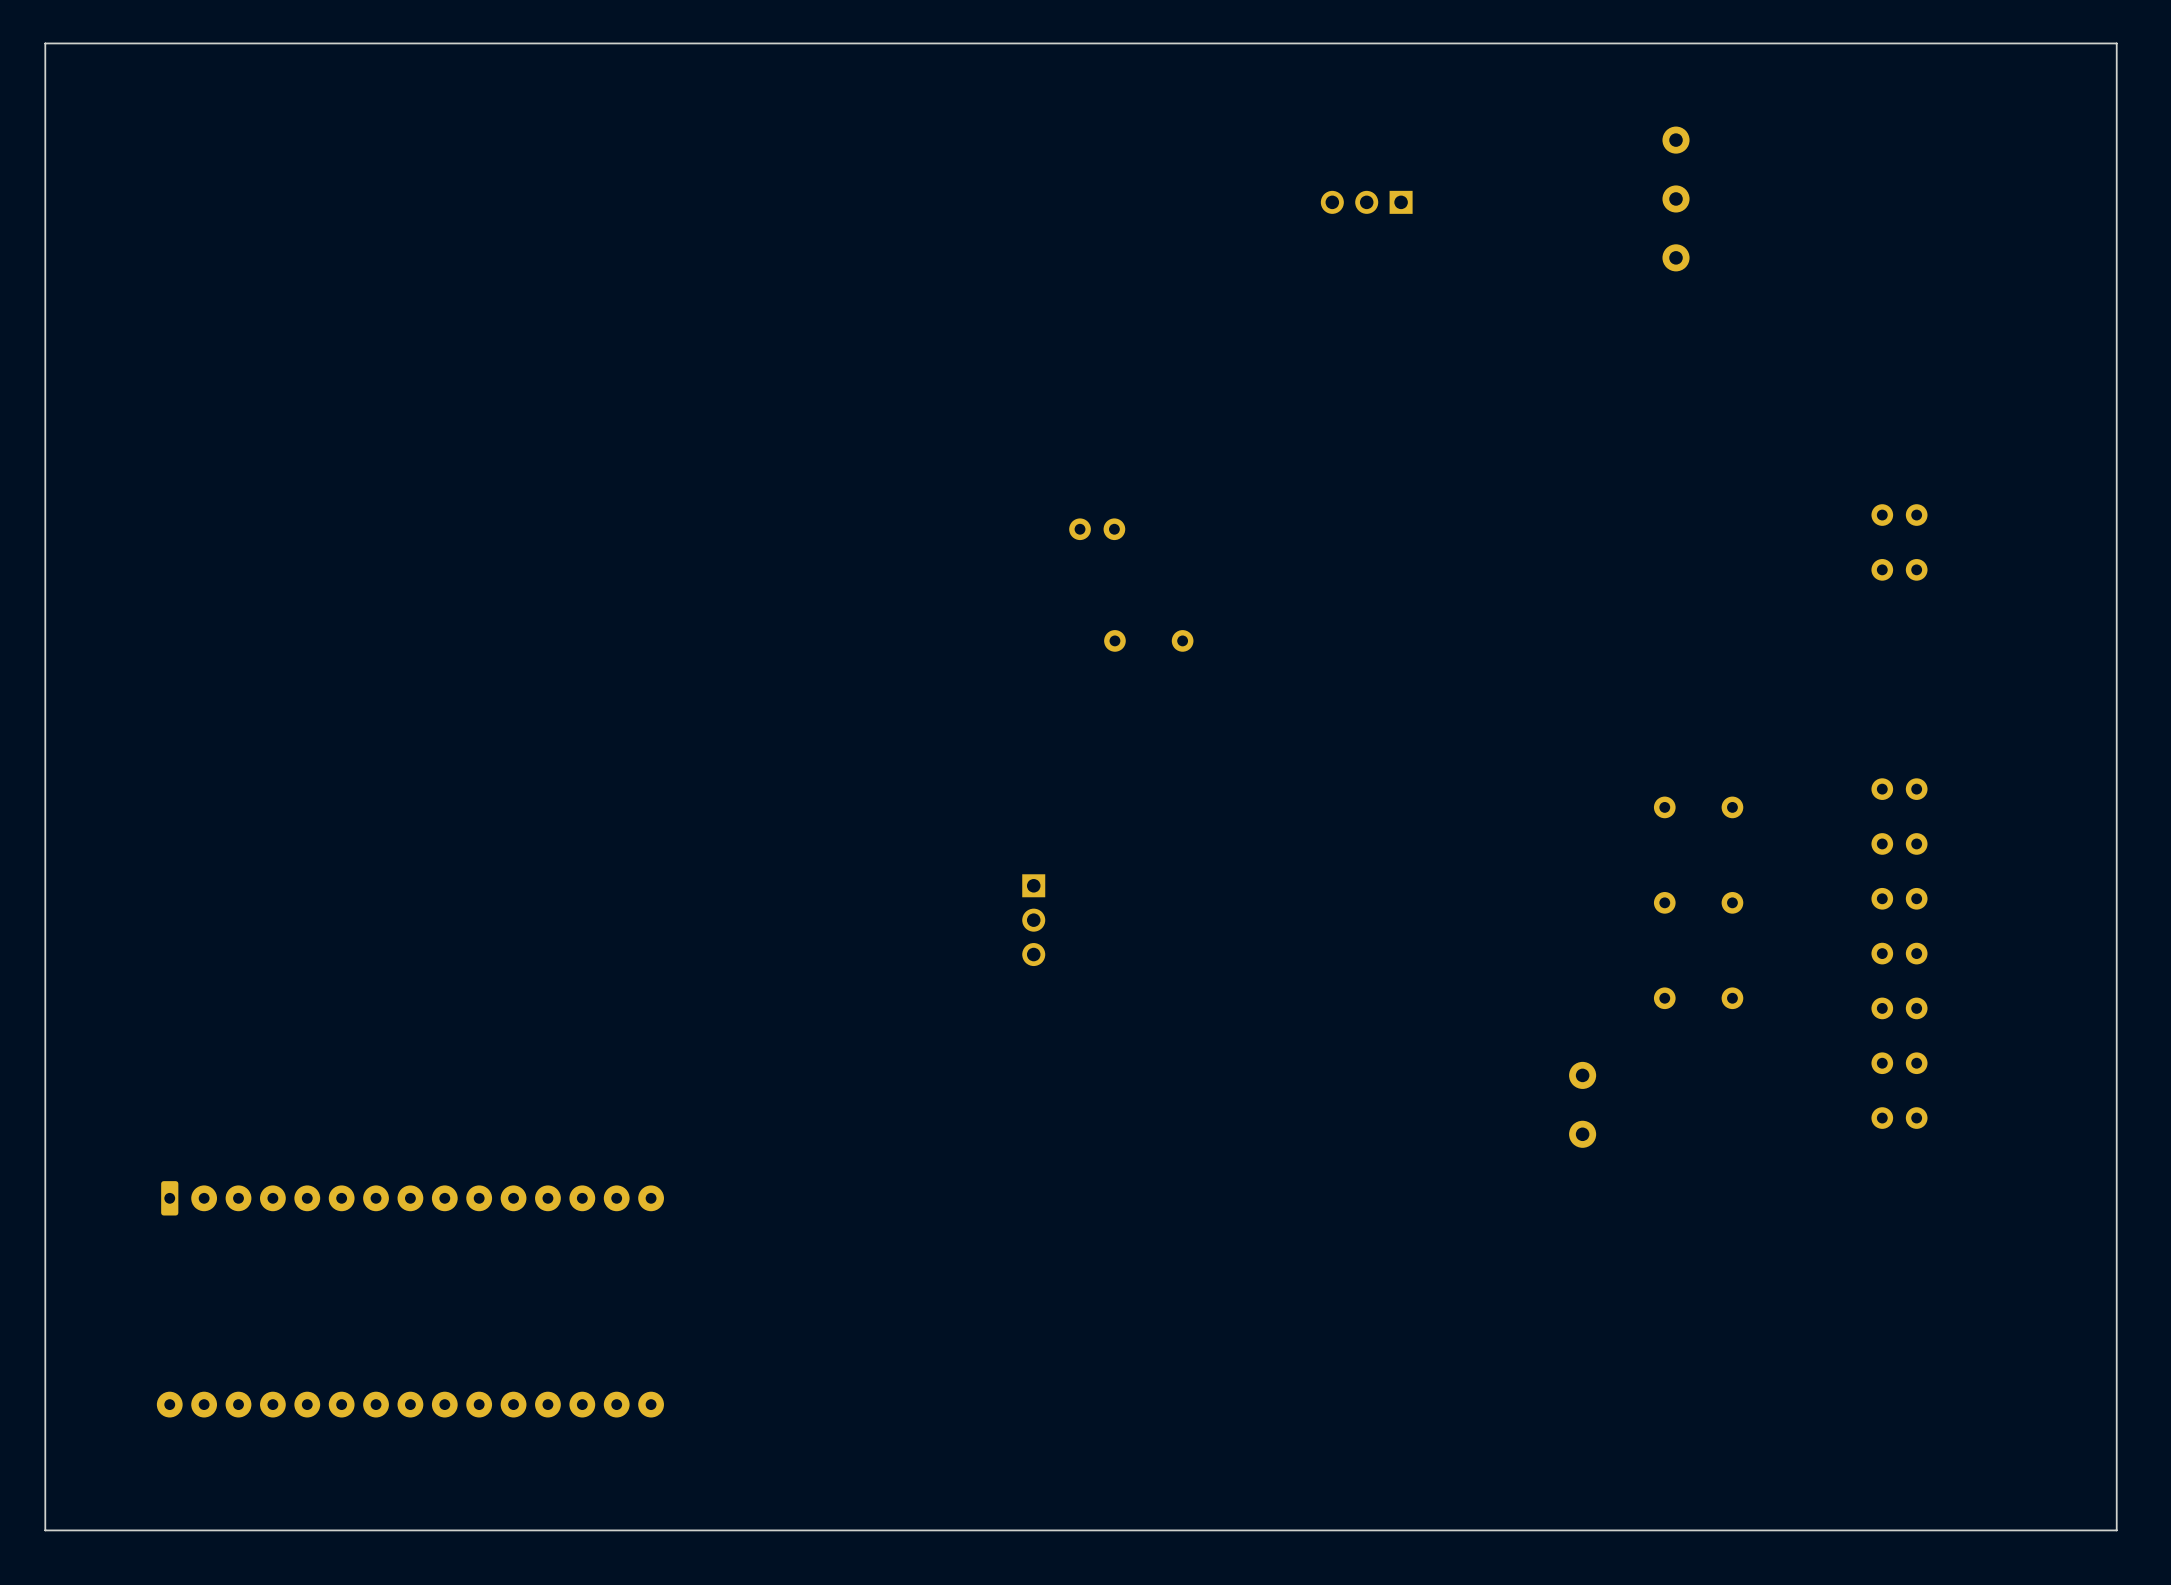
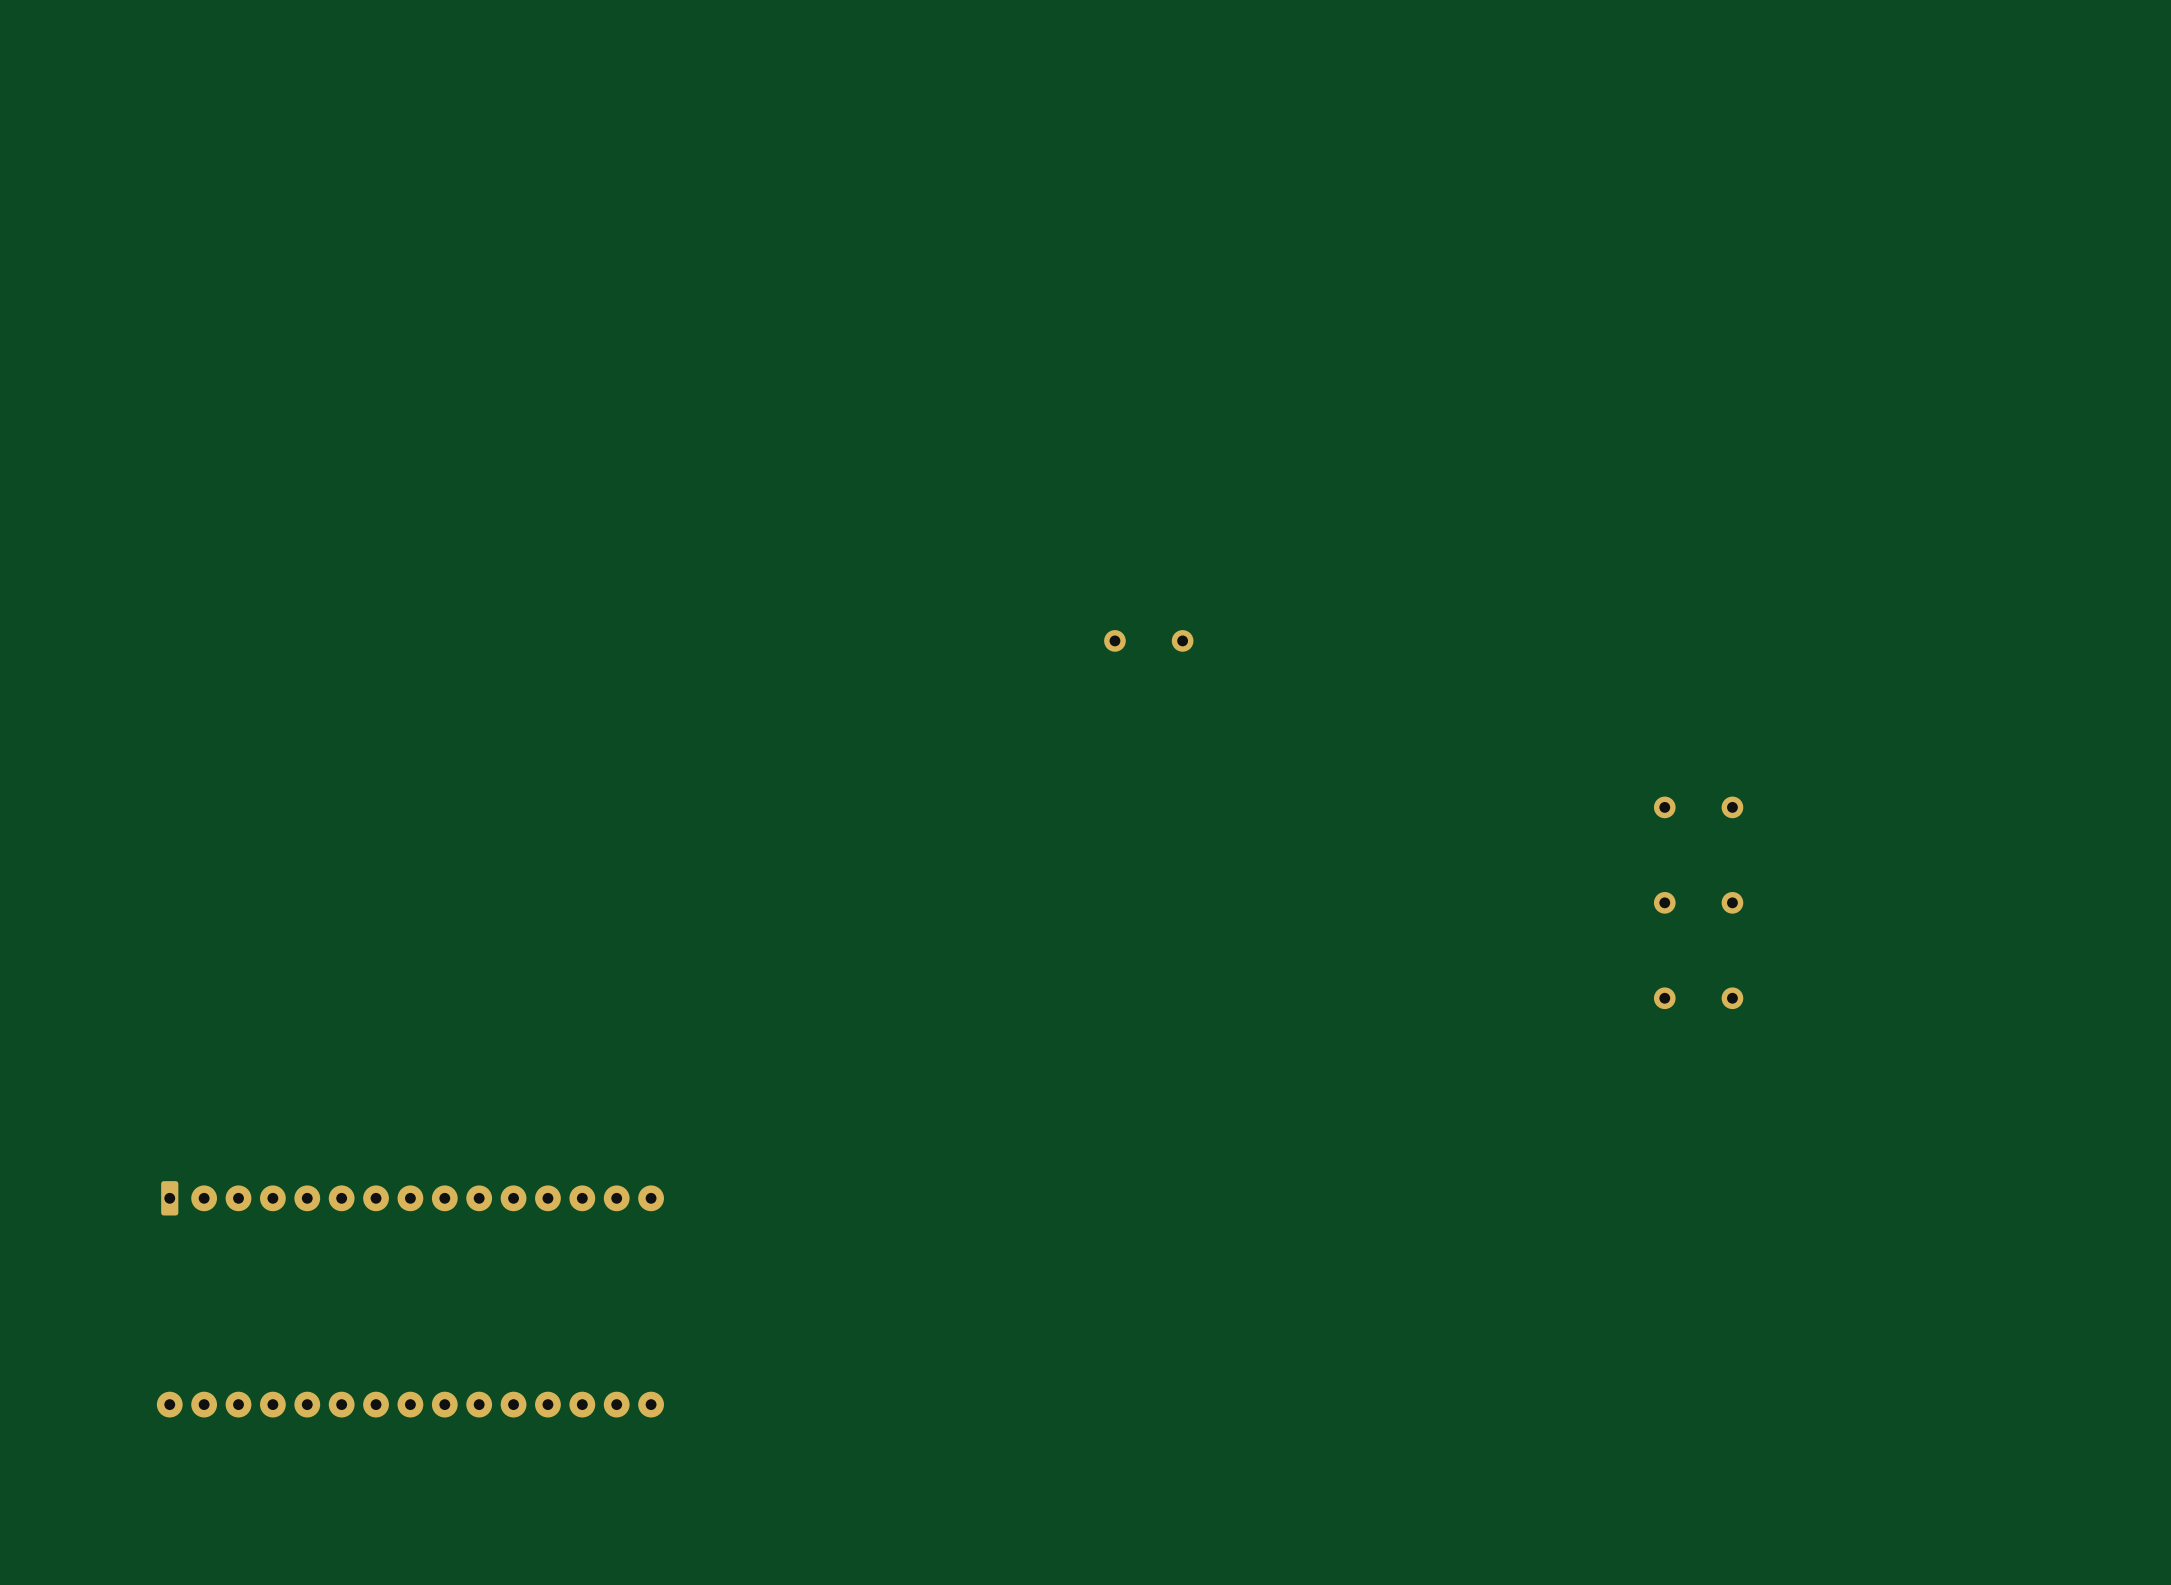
board edge: (2116, 43) (45, 43) (45, 1530) (2116, 1530) (2116, 43) -> none
part: (1676, 140) -> none
part: (1676, 198) -> none
part: (1366, 202) -> none
part: (1676, 257) -> none
part: (1899, 515) -> none
part: (1097, 529) -> none
part: (1899, 569) -> none
part: (1899, 789) -> none
part: (1899, 843) -> none
part: (1899, 898) -> none
part: (1033, 920) -> none
part: (1899, 953) -> none
part: (1899, 1008) -> none
part: (1899, 1063) -> none
part: (1582, 1075) -> none
part: (1899, 1118) -> none
part: (1582, 1134) -> none

